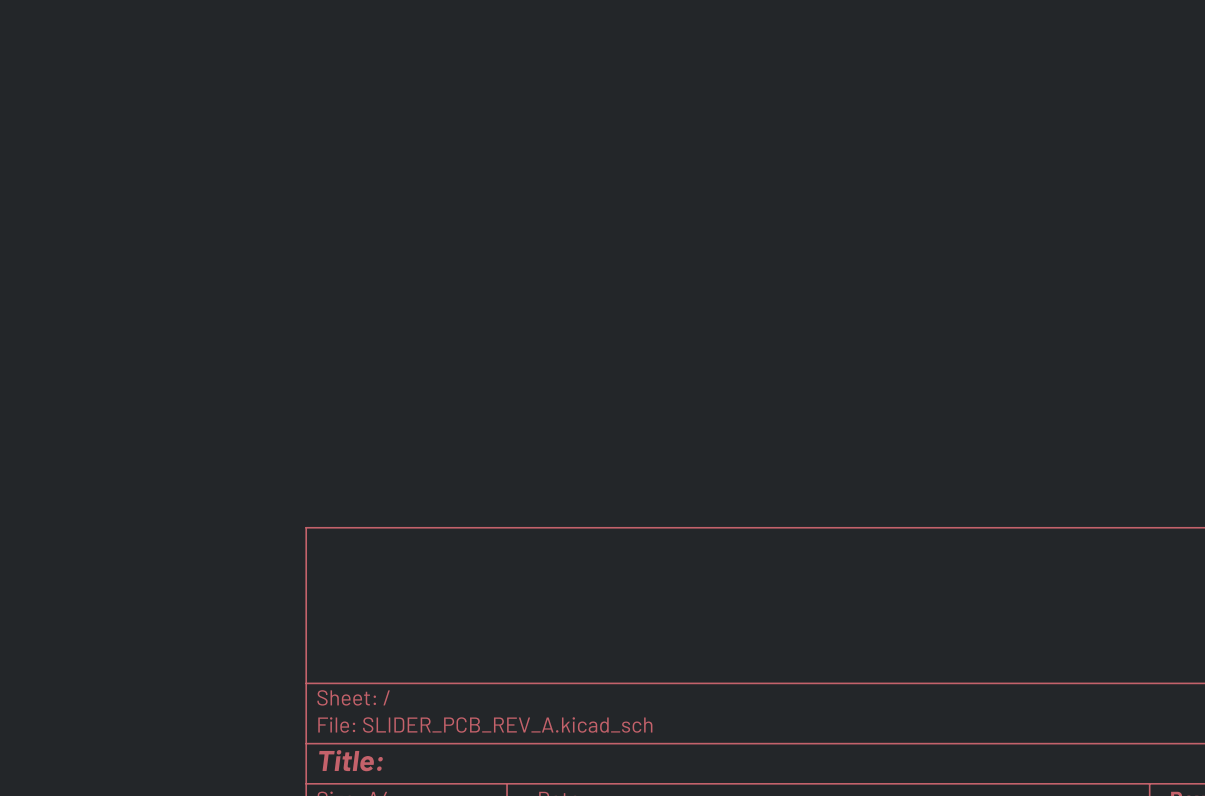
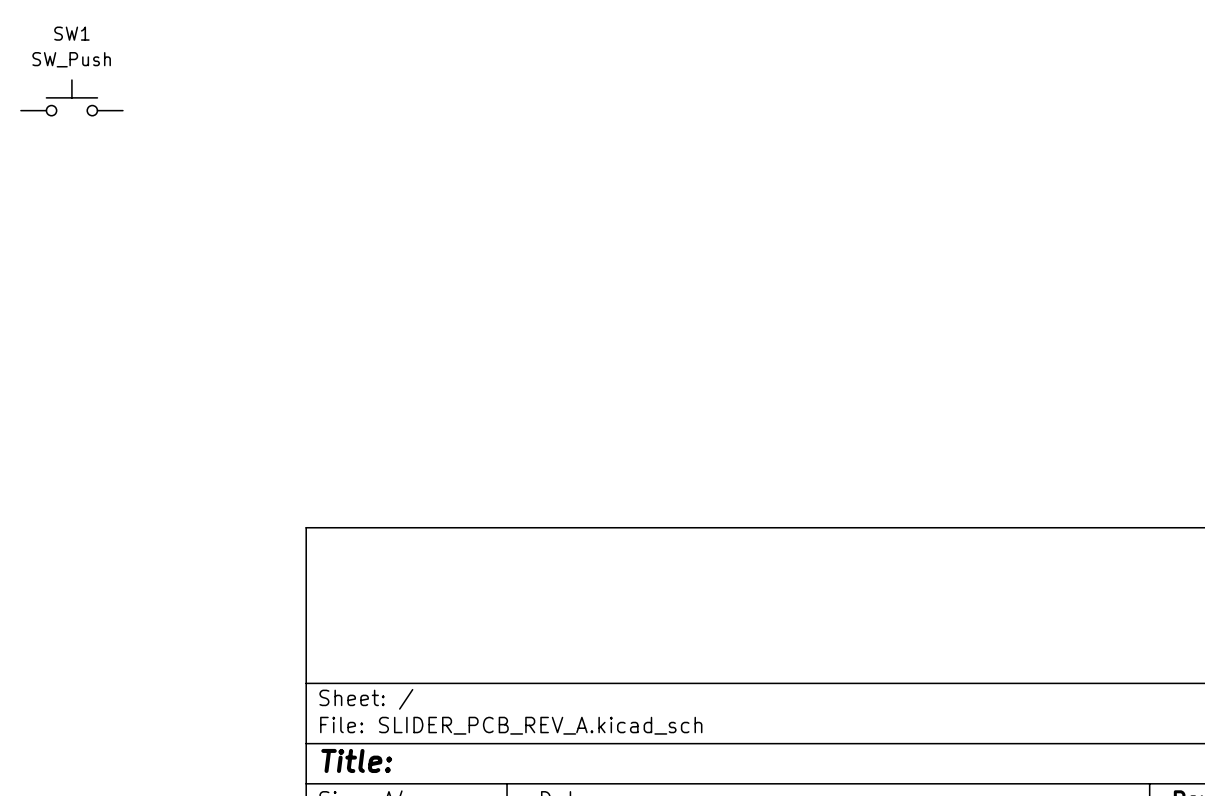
SW1: none -> SW_Push (71, 97)

